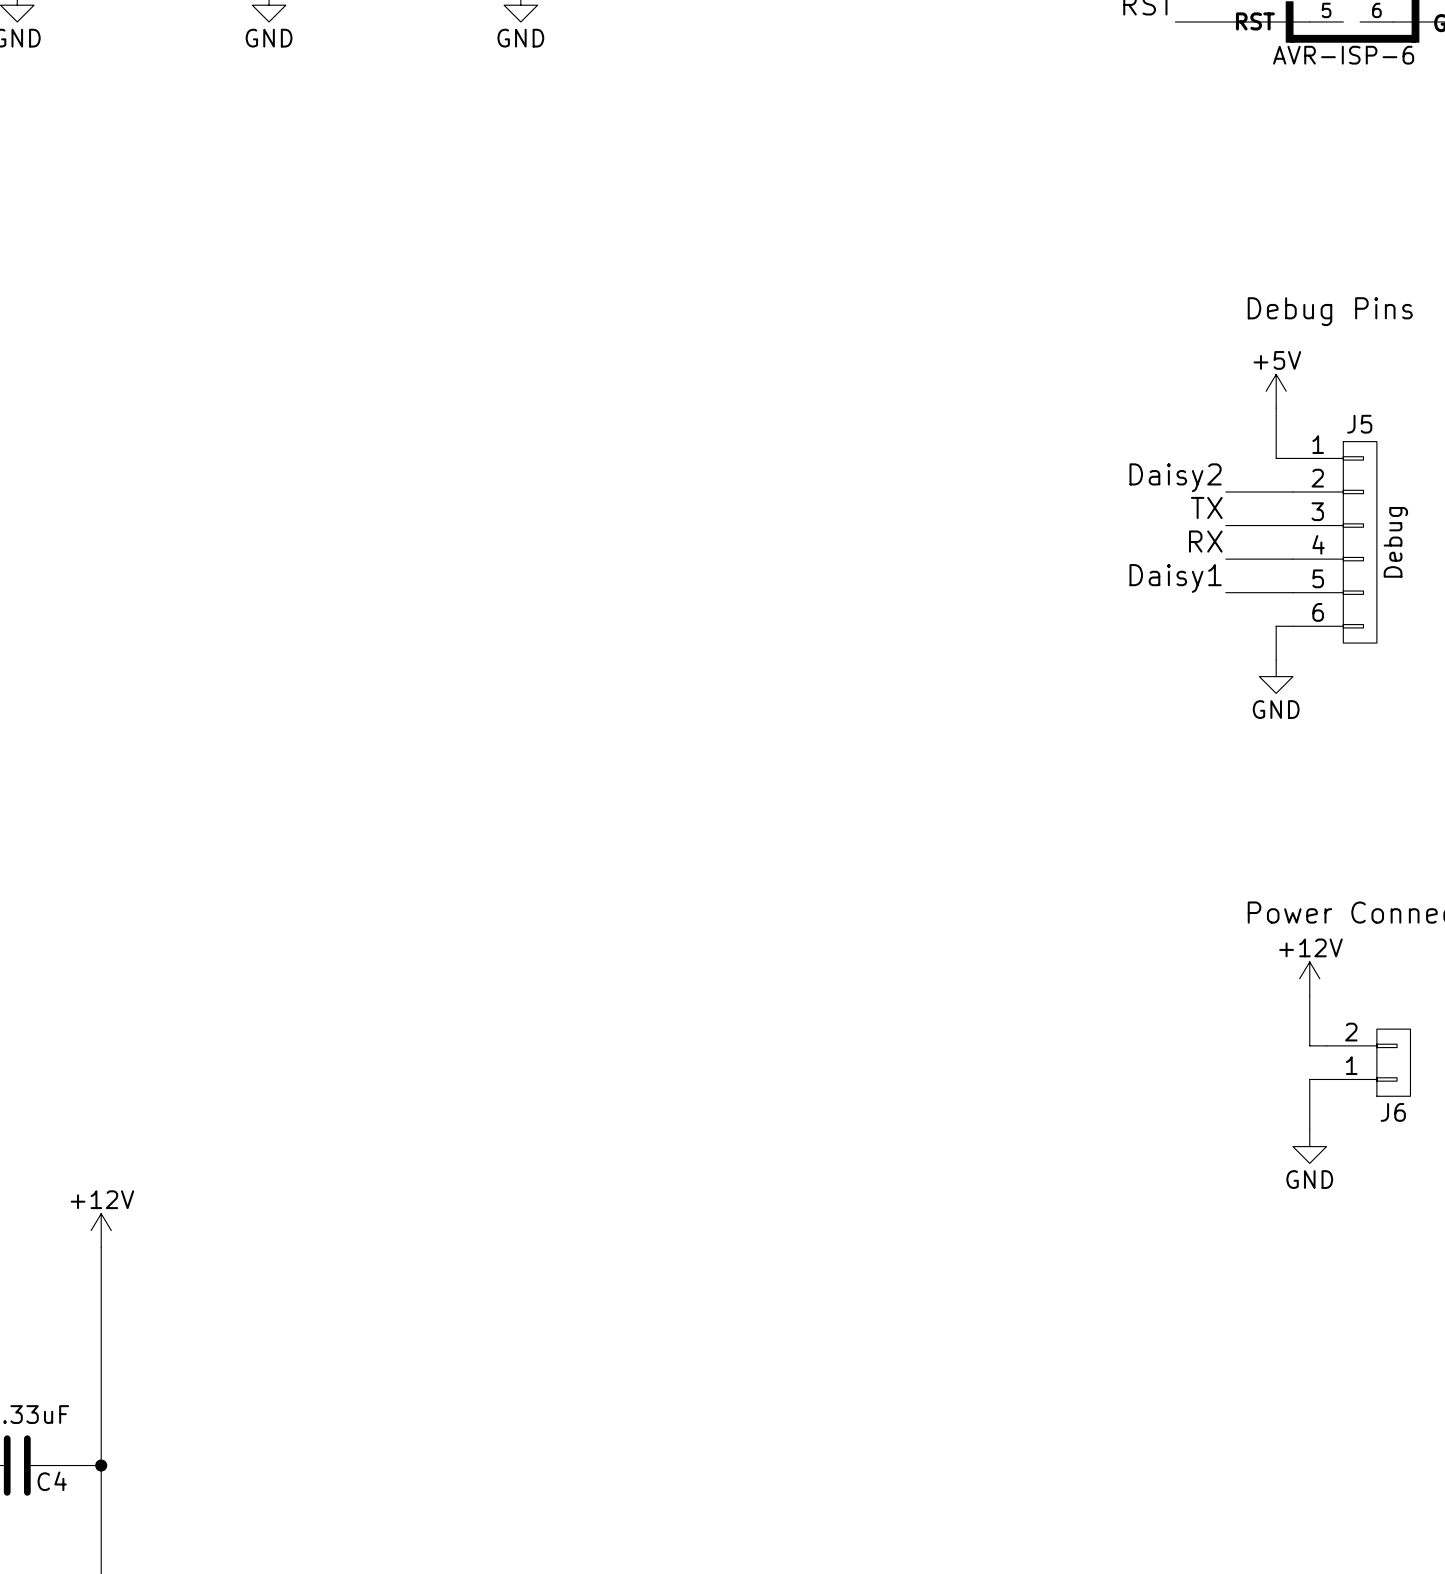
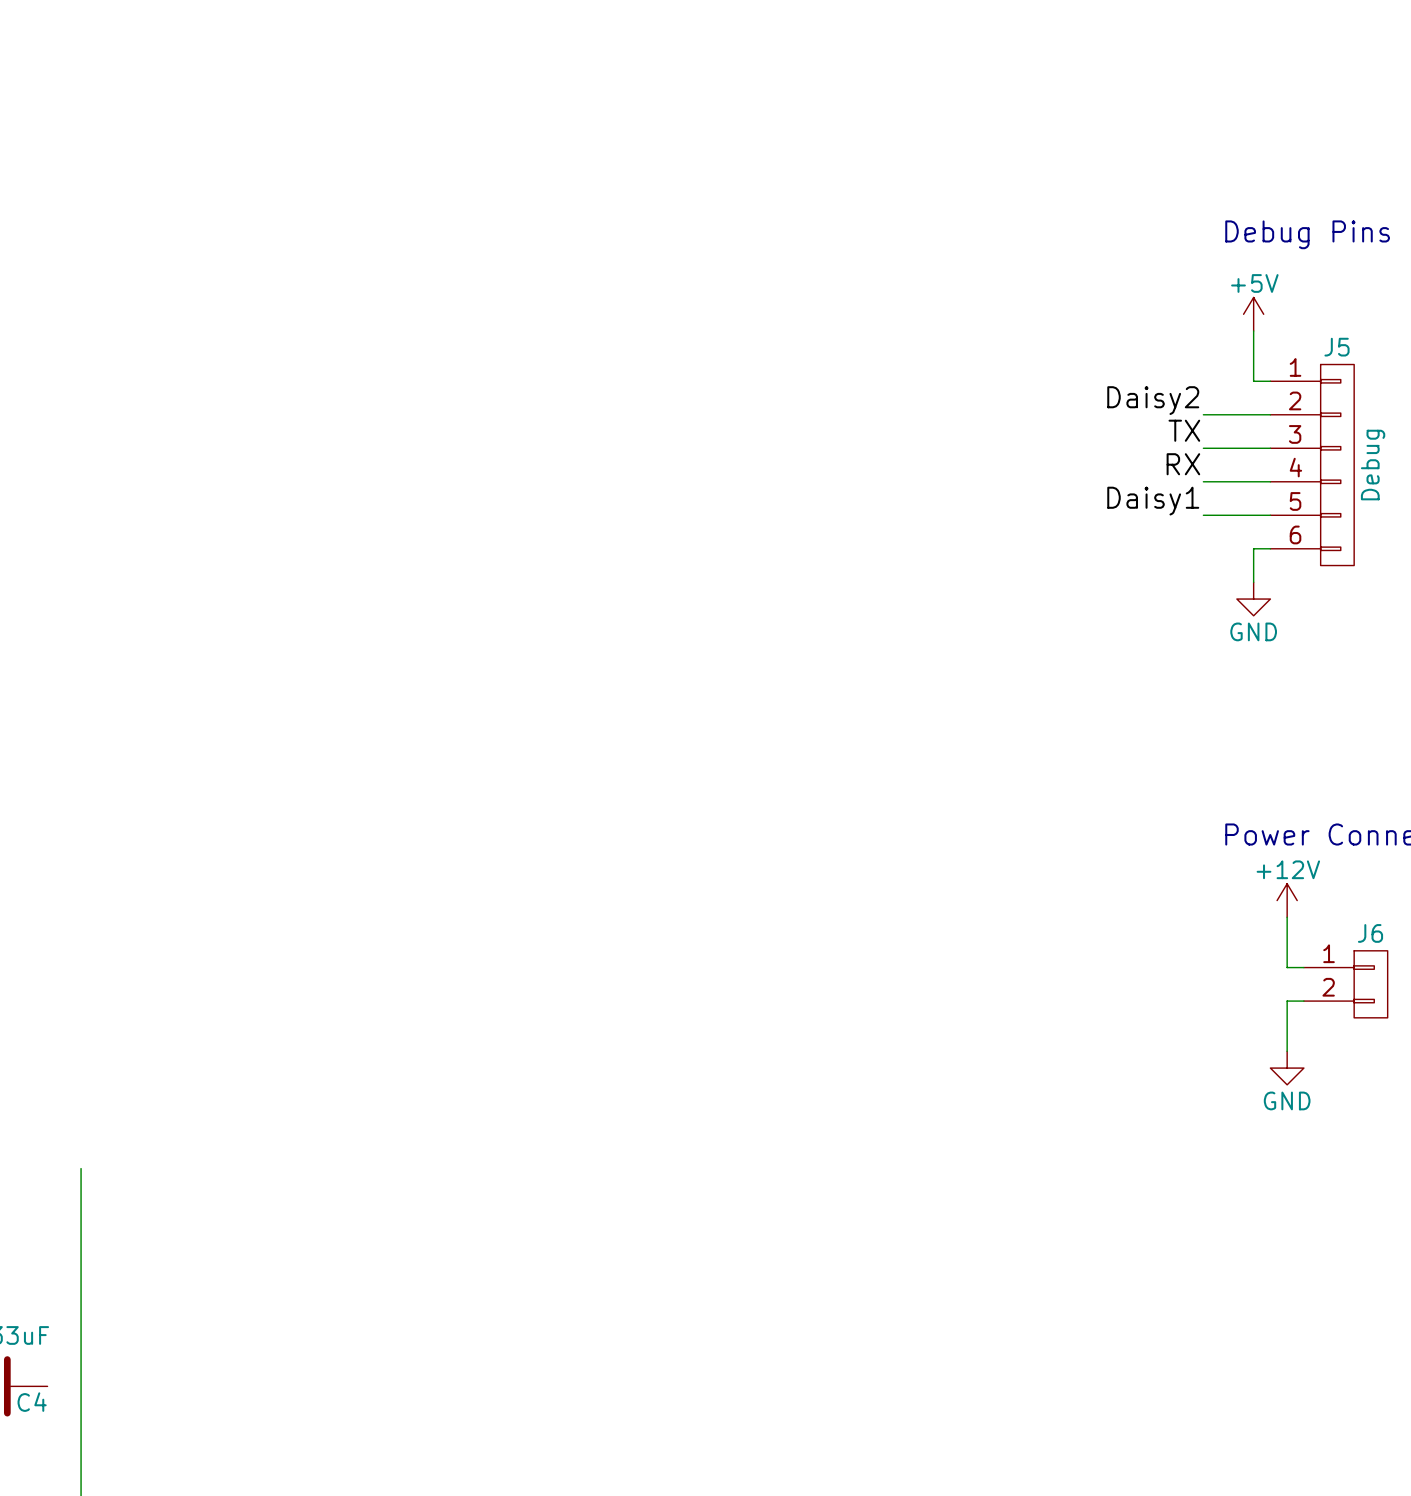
J6 flip: as is (1393, 1062) -> up-down (1370, 984)
power symbol: +12V (101, 1230) -> none
wire: (67, 1465) (101, 1465) -> none
junction: (101, 1465) -> none

